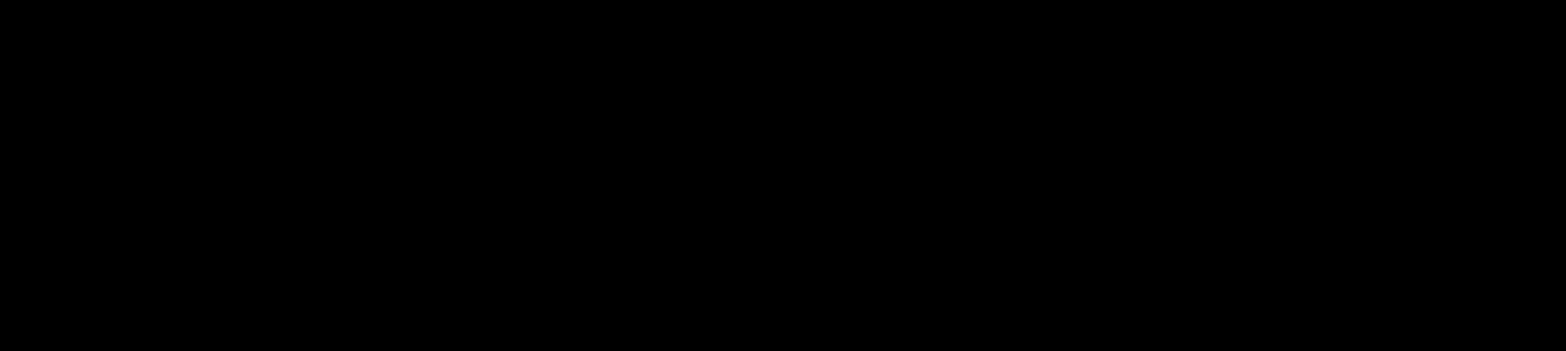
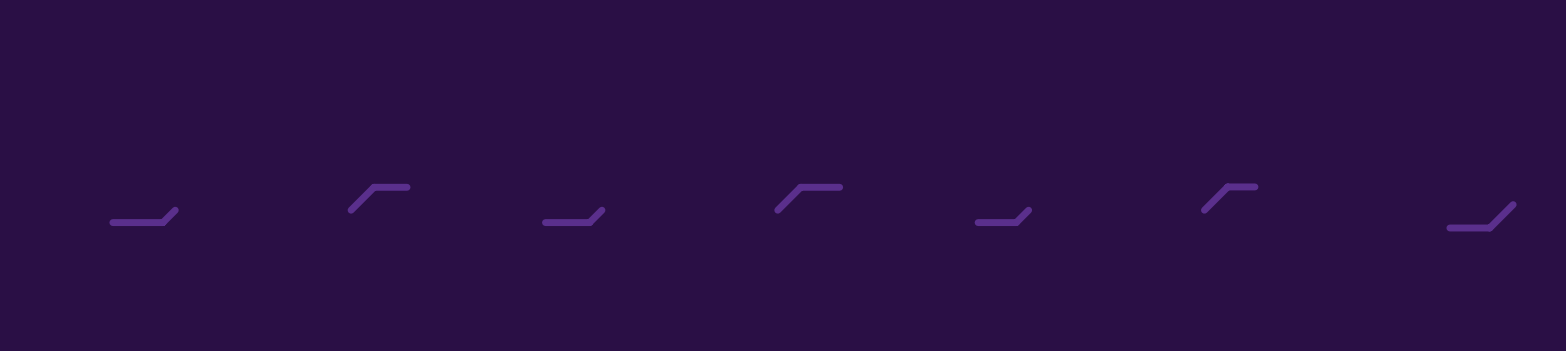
track: none -> (1254, 186) (1227, 186) (1204, 210)
track: none -> (407, 187) (374, 187) (351, 210)
track: none -> (839, 187) (800, 187) (777, 210)
track: none -> (1513, 204) (1489, 227) (1449, 227)
track: none -> (175, 210) (162, 222) (112, 222)
track: none -> (601, 210) (589, 222) (545, 222)
track: none -> (1028, 210) (1016, 222) (978, 222)

